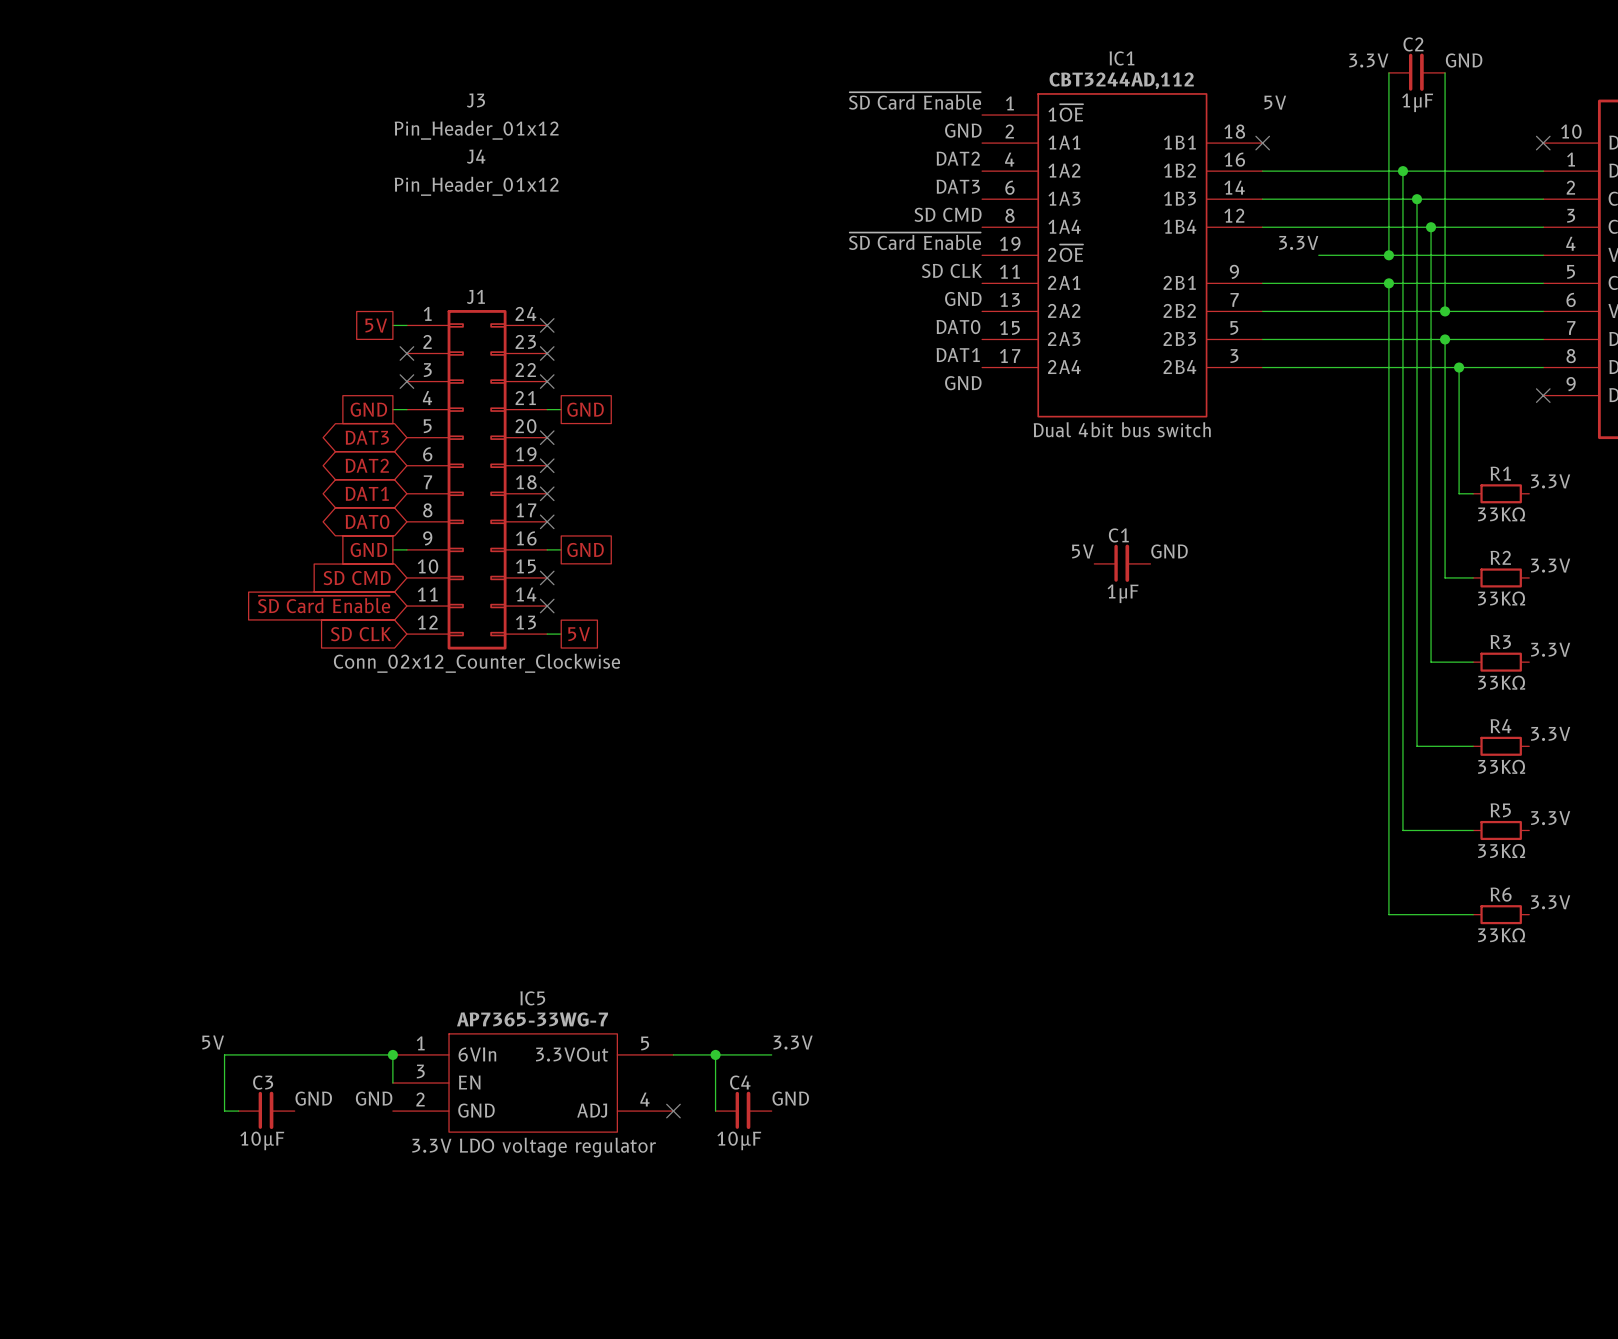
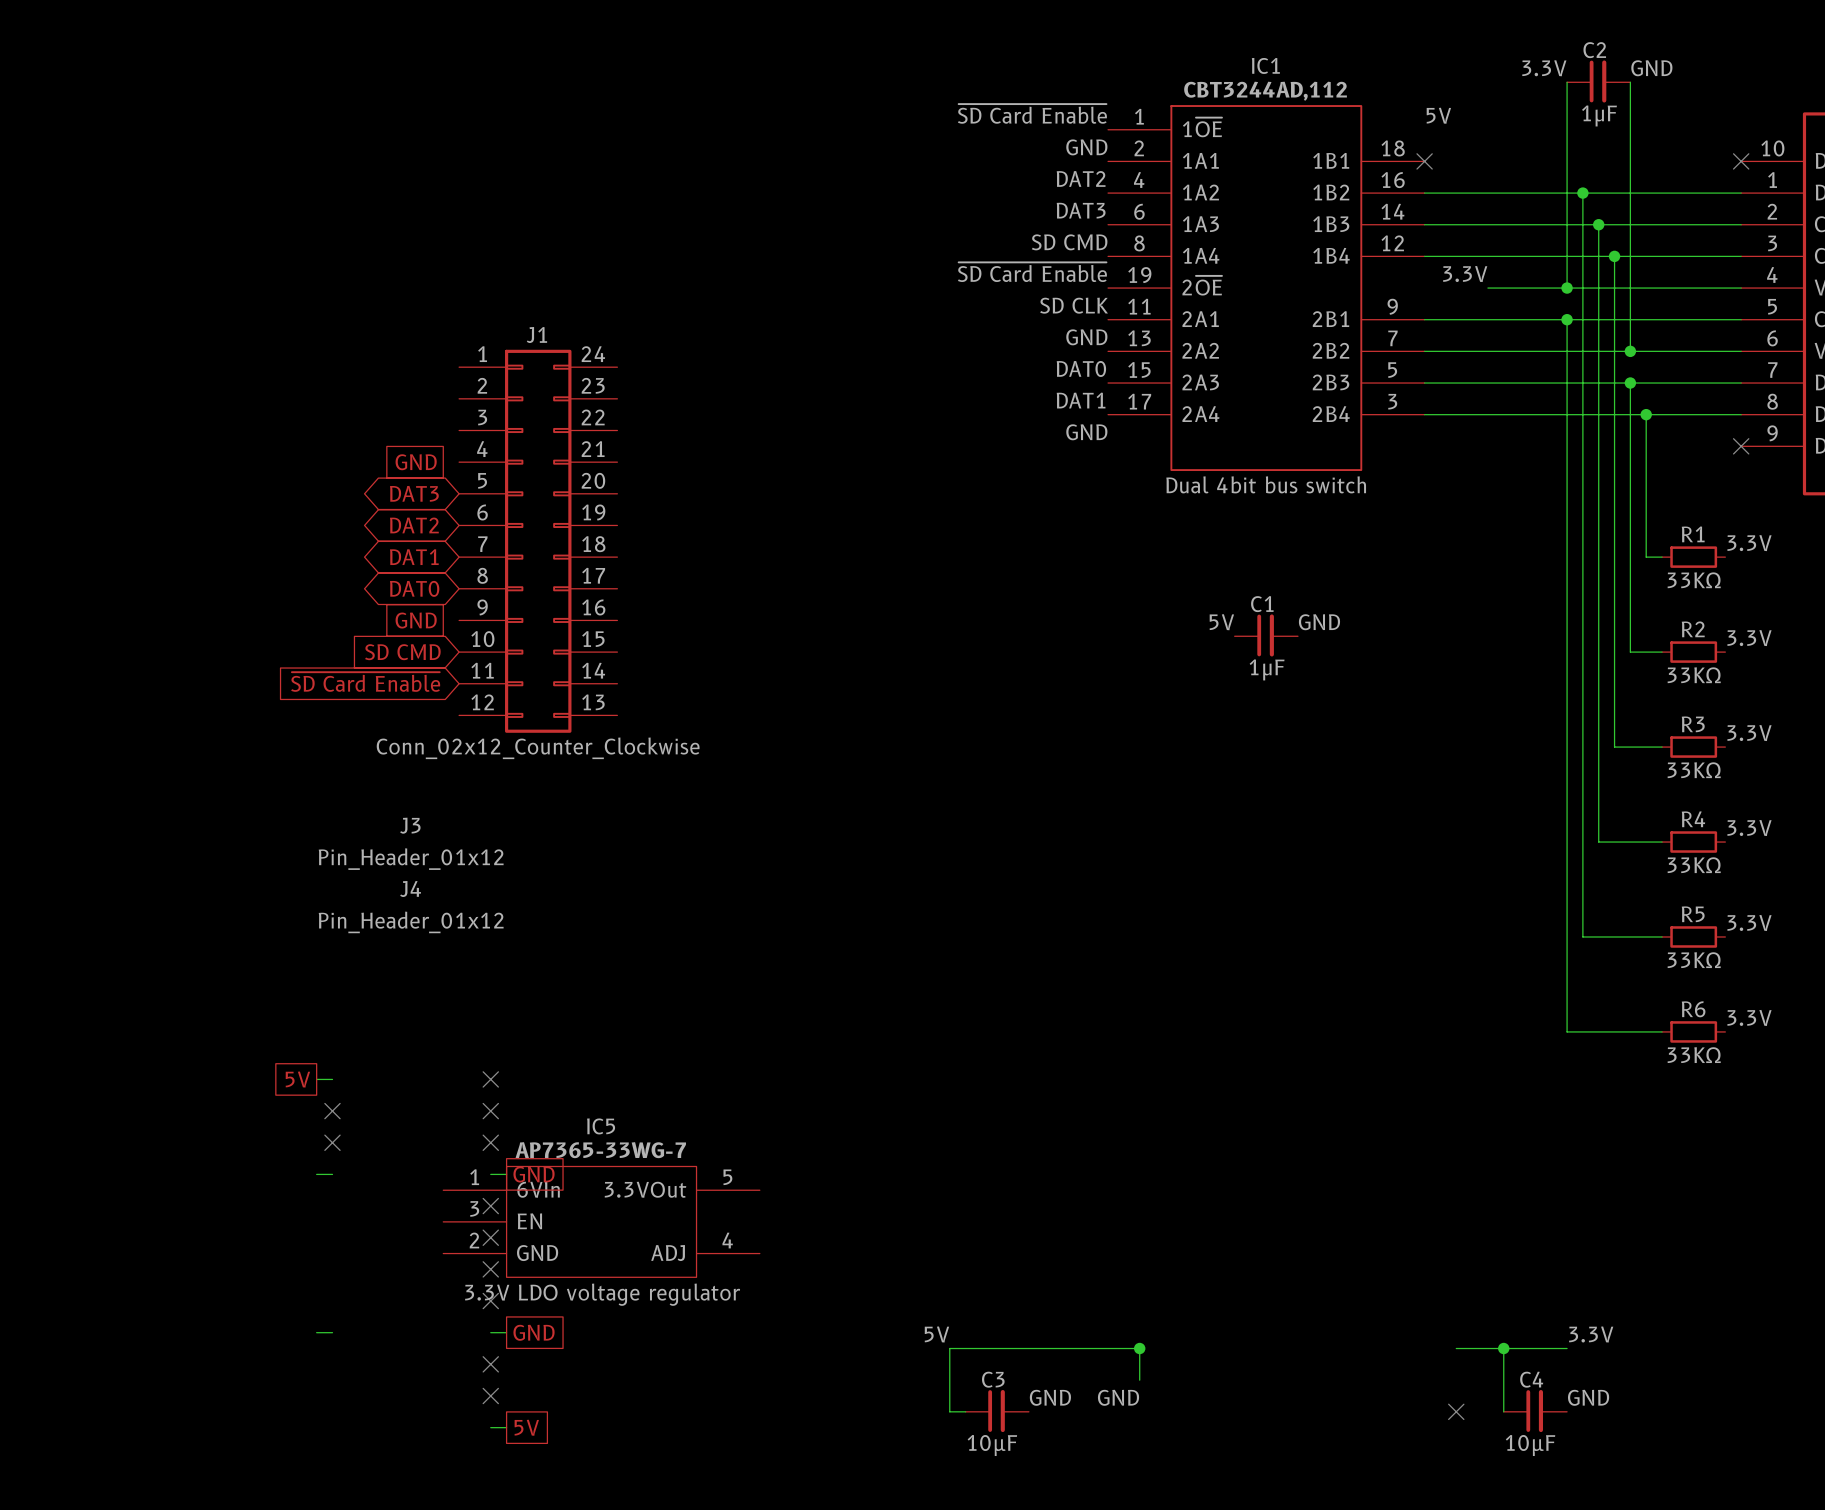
J3 position: (476, 116) -> (411, 843)
J4 position: (476, 172) -> (411, 907)
global label: 5V (376, 325) -> none
wire: (392, 325) (406, 325) -> none
no-connect mark: (547, 325) -> none
no-connect mark: (406, 353) -> none
no-connect mark: (547, 353) -> none
no-connect mark: (406, 381) -> none
no-connect mark: (547, 381) -> none
wire: (392, 409) (406, 409) -> none
wire: (547, 409) (561, 409) -> none
global label: GND (585, 409) -> none
no-connect mark: (547, 437) -> none
no-connect mark: (547, 465) -> none
no-connect mark: (547, 493) -> none
no-connect mark: (547, 521) -> none
wire: (392, 549) (406, 549) -> none
wire: (547, 549) (561, 549) -> none
global label: GND (585, 549) -> none
no-connect mark: (547, 577) -> none
no-connect mark: (547, 606) -> none
global label: SD CLK (361, 634) -> none
wire: (547, 634) (561, 634) -> none
global label: 5V (579, 634) -> none
global label: none -> 5V (297, 1079)
wire: none -> (316, 1079) (332, 1079)
no-connect mark: none -> (490, 1079)
no-connect mark: none -> (332, 1111)
no-connect mark: none -> (490, 1111)
no-connect mark: none -> (332, 1142)
no-connect mark: none -> (490, 1142)
wire: none -> (316, 1174) (332, 1174)
wire: none -> (490, 1174) (506, 1174)
global label: none -> GND (534, 1174)
label: 5V (213, 1042) -> none
label: 3.3V (793, 1042) -> none
junction: (392, 1054) -> none
wire: (673, 1054) (771, 1054) -> none
wire: (715, 1054) (715, 1111) -> none
junction: (715, 1054) -> none
no-connect mark: none -> (490, 1206)
wire: (392, 1083) (392, 1054) (224, 1054) (224, 1111) (238, 1111) -> none
no-connect mark: none -> (490, 1237)
label: GND (313, 1098) -> none
label: GND (374, 1098) -> none
label: GND (790, 1098) -> none
C3 position: (266, 1110) -> (997, 1411)
C4 position: (743, 1110) -> (1535, 1411)
no-connect mark: (673, 1111) -> none
no-connect mark: none -> (490, 1269)
no-connect mark: none -> (490, 1301)
wire: none -> (316, 1332) (332, 1332)
wire: none -> (490, 1332) (506, 1332)
global label: none -> GND (534, 1332)
label: none -> 5V (936, 1334)
label: none -> 3.3V (1591, 1334)
junction: none -> (1139, 1348)
wire: none -> (1456, 1348) (1567, 1348)
wire: none -> (1503, 1348) (1503, 1411)
junction: none -> (1503, 1348)
no-connect mark: none -> (490, 1364)
wire: none -> (1139, 1380) (1139, 1348) (949, 1348) (949, 1411) (965, 1411)
no-connect mark: none -> (490, 1396)
label: none -> GND (1050, 1397)
label: none -> GND (1118, 1397)
label: none -> GND (1588, 1397)
no-connect mark: none -> (1456, 1411)
wire: none -> (490, 1427) (506, 1427)
global label: none -> 5V (526, 1427)

